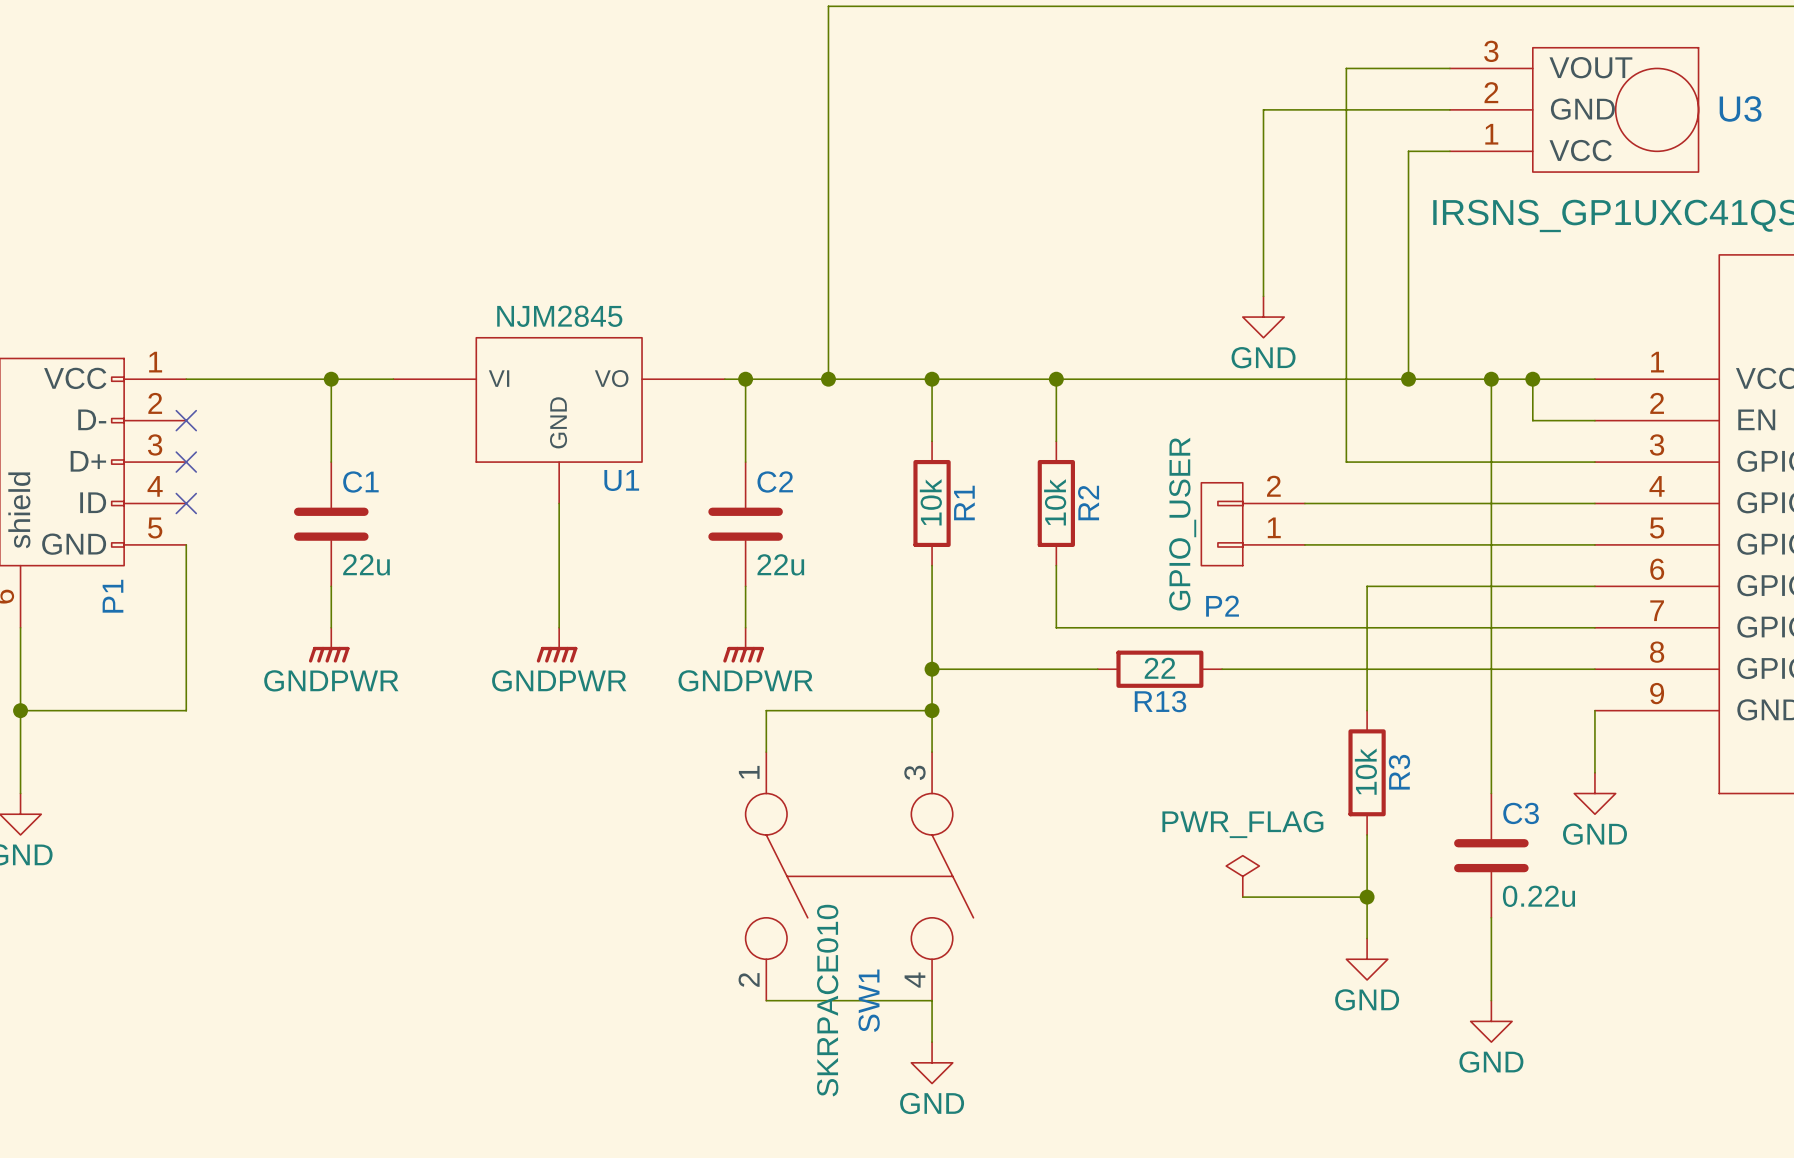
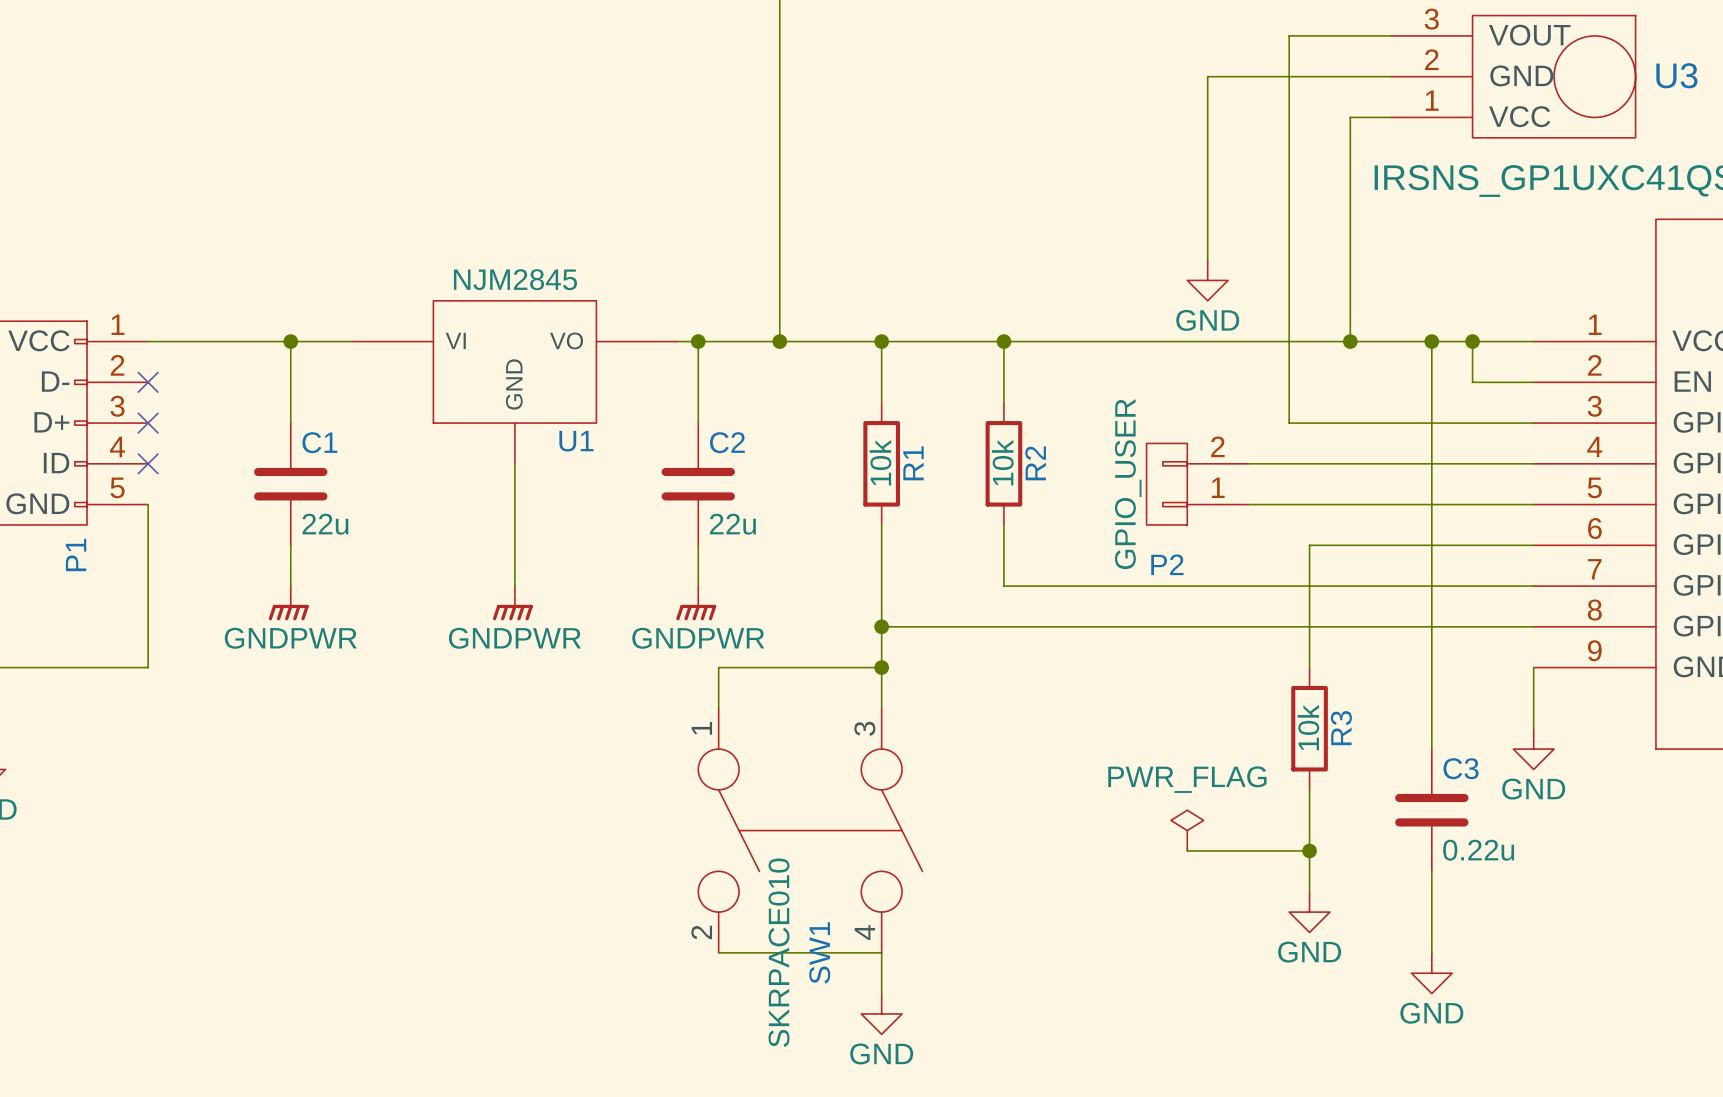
wire: none -> (1044, 626) (1166, 626)
R13: 22 (1159, 669) -> none

